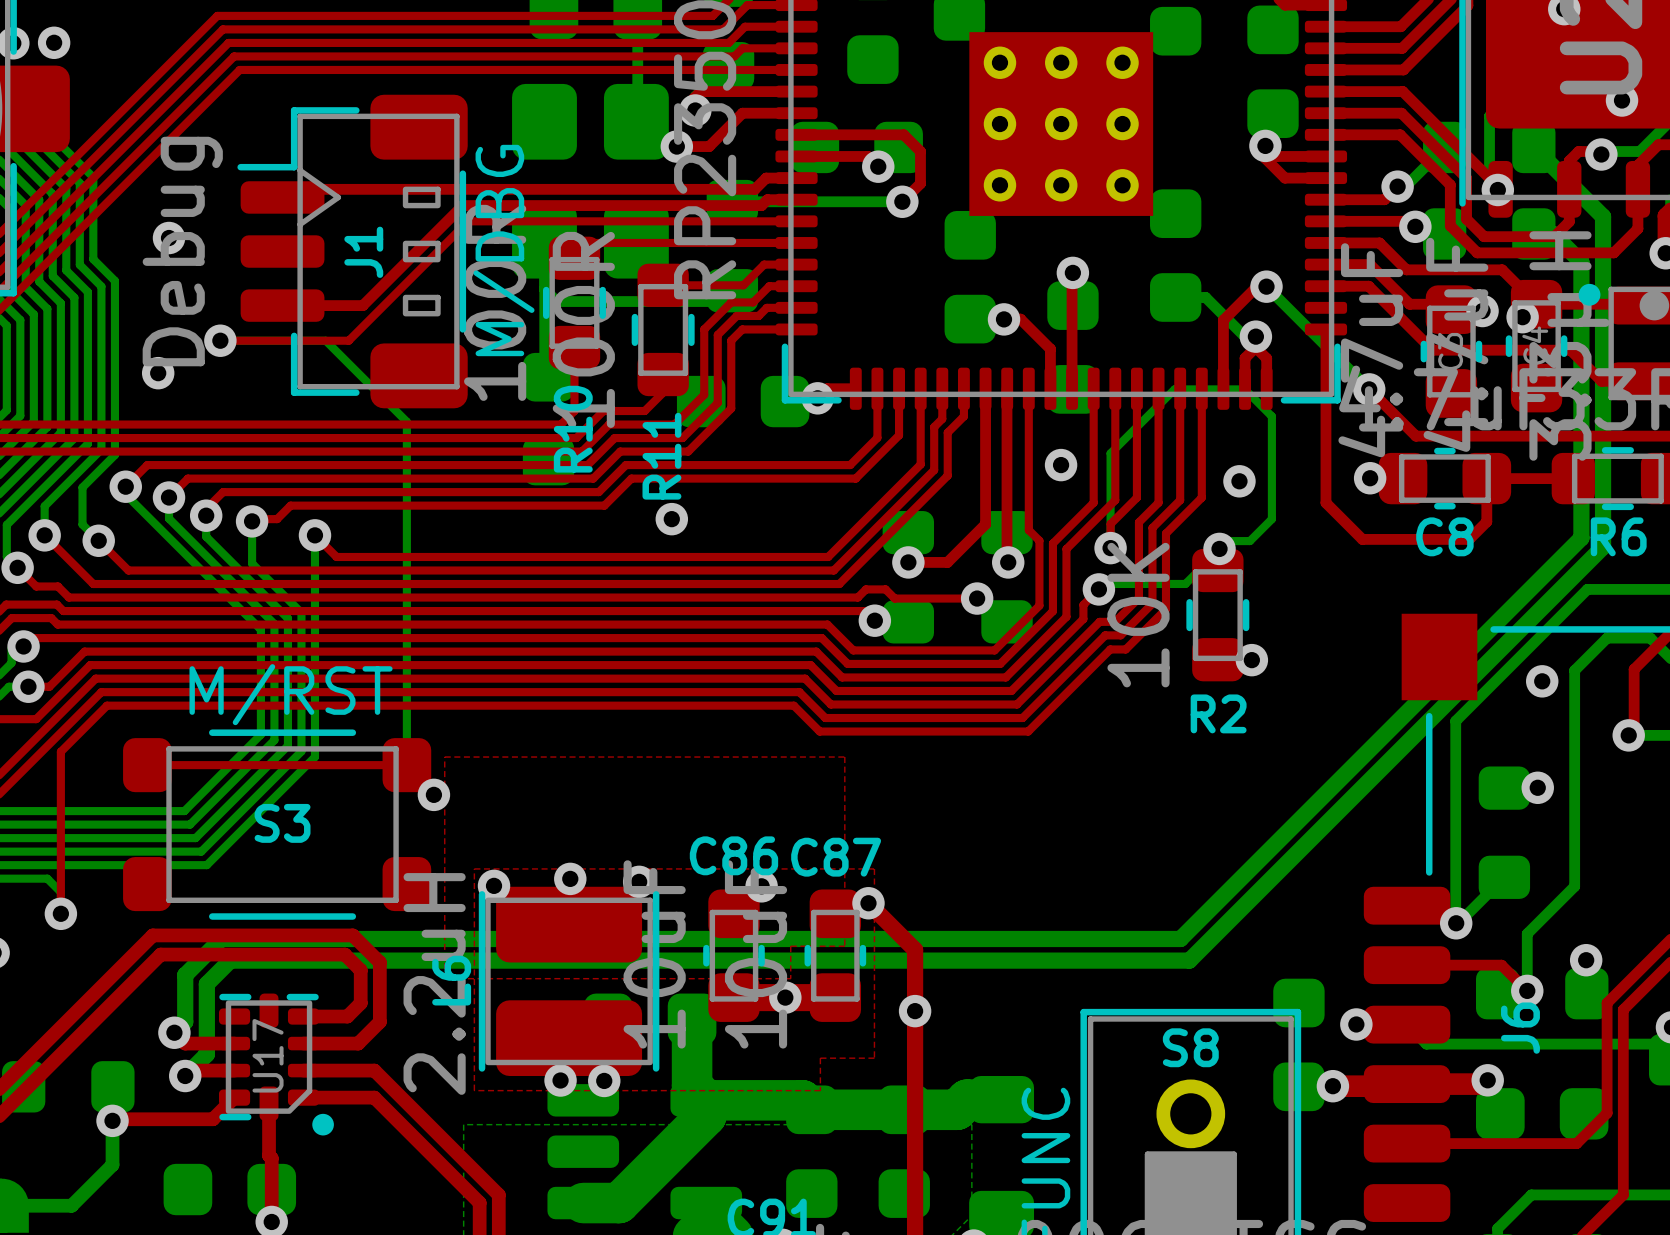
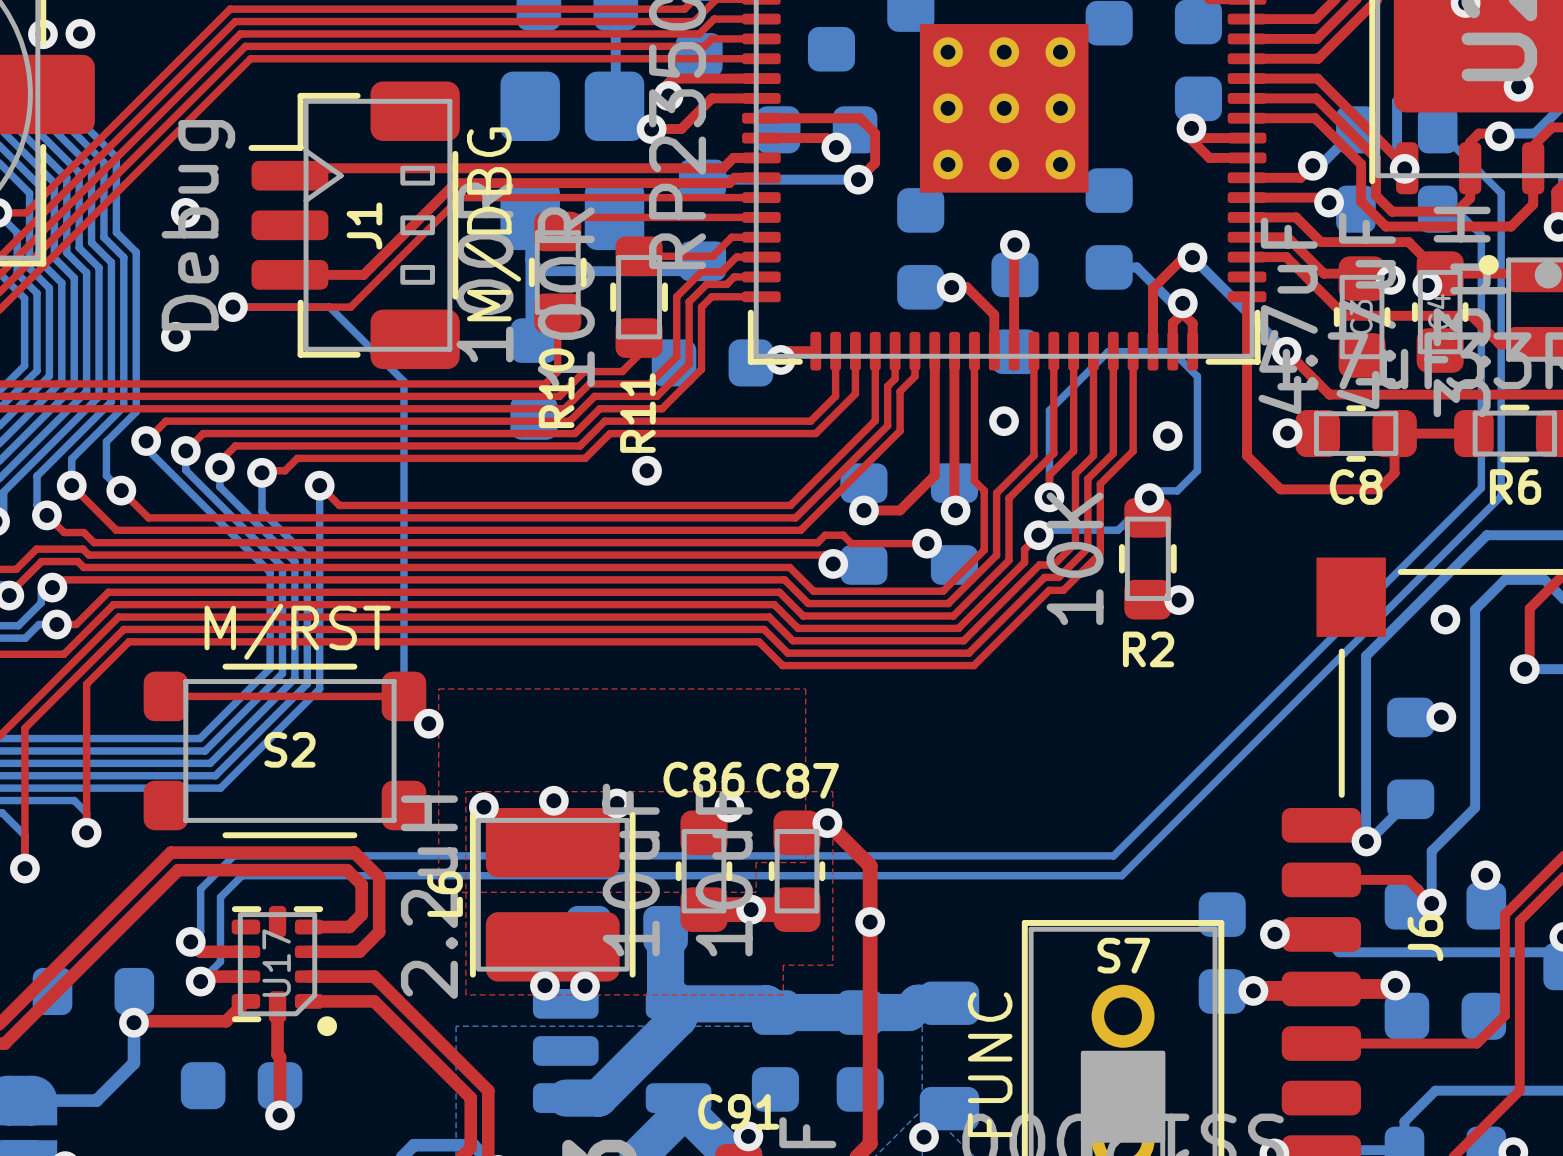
bottom track width: thick (1533, 147) (1603, 216) (1603, 547) (1189, 960) (230, 960) (206, 984) (206, 1054) (185, 1076) -> thin (1437, 129) (1501, 193) (1501, 496) (1121, 875) (242, 875) (220, 897) (220, 961) (200, 981)
bottom track width: thick (1533, 233) (1553, 233) (1581, 262) (1581, 538) (1180, 938) (221, 938) (185, 975) (185, 1021) (174, 1032) -> thin (1437, 209) (1455, 209) (1481, 235) (1481, 488) (1113, 855) (233, 855) (200, 889) (200, 931) (190, 941)
S3 name: S3 (282, 823) -> S2 (289, 749)
S8 name: S8 (1190, 1047) -> S7 (1123, 955)

